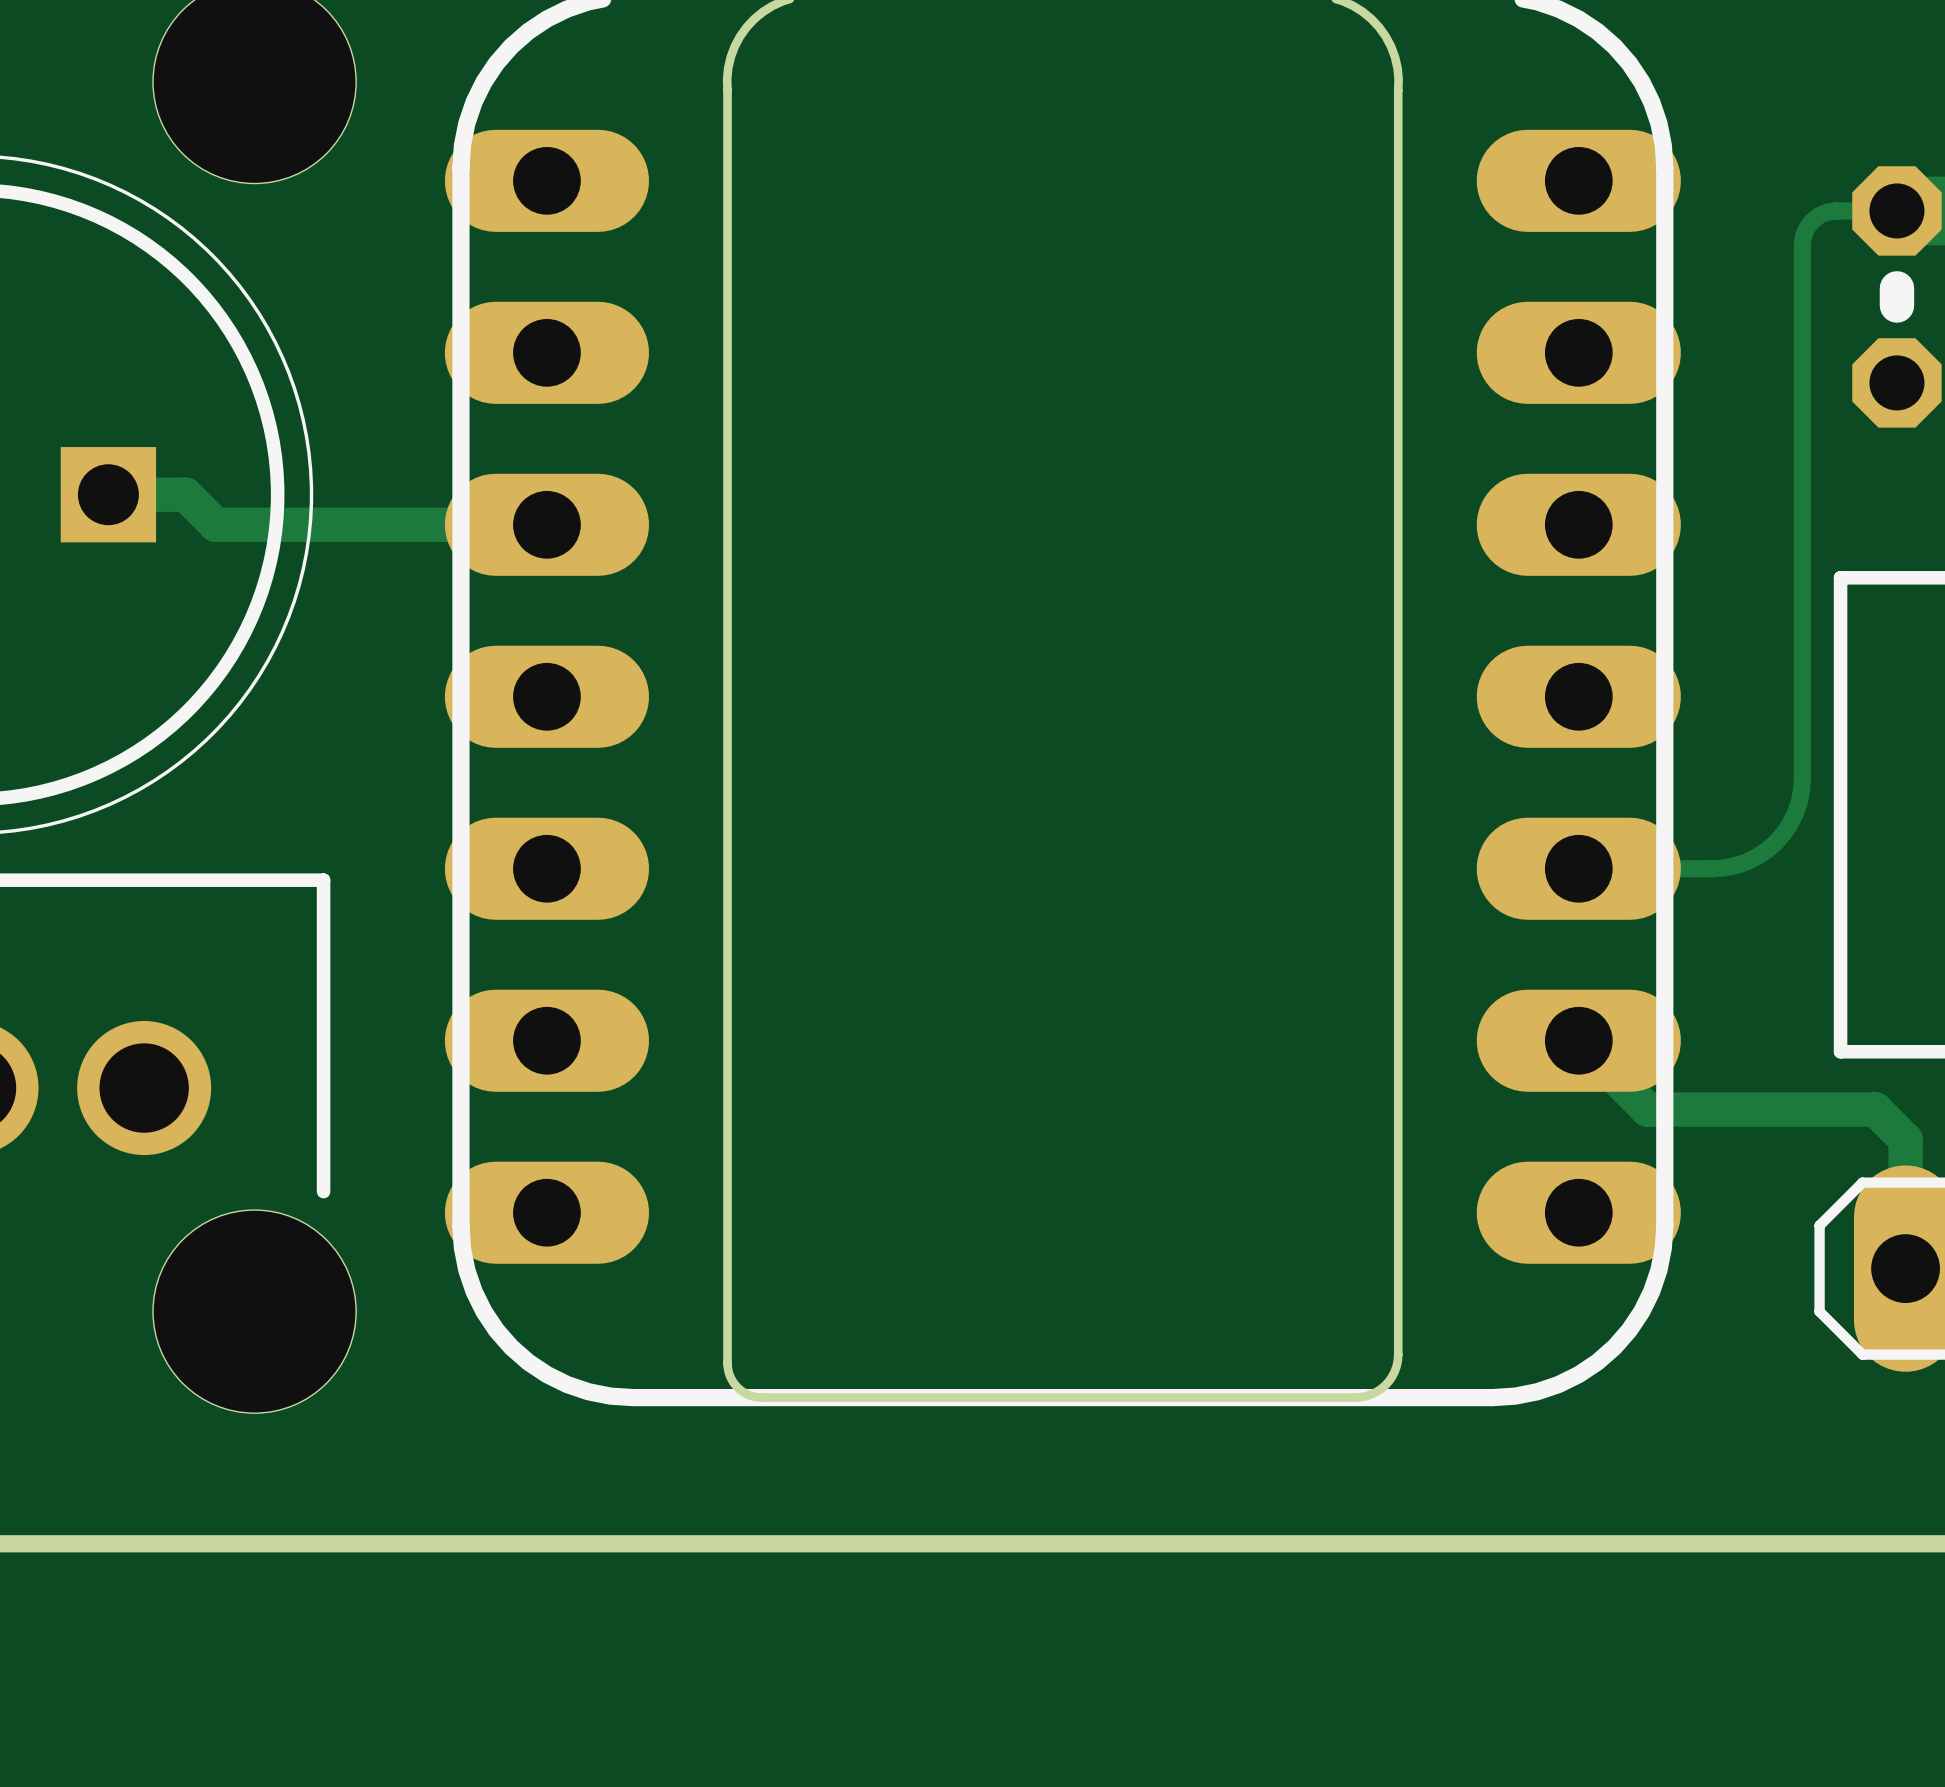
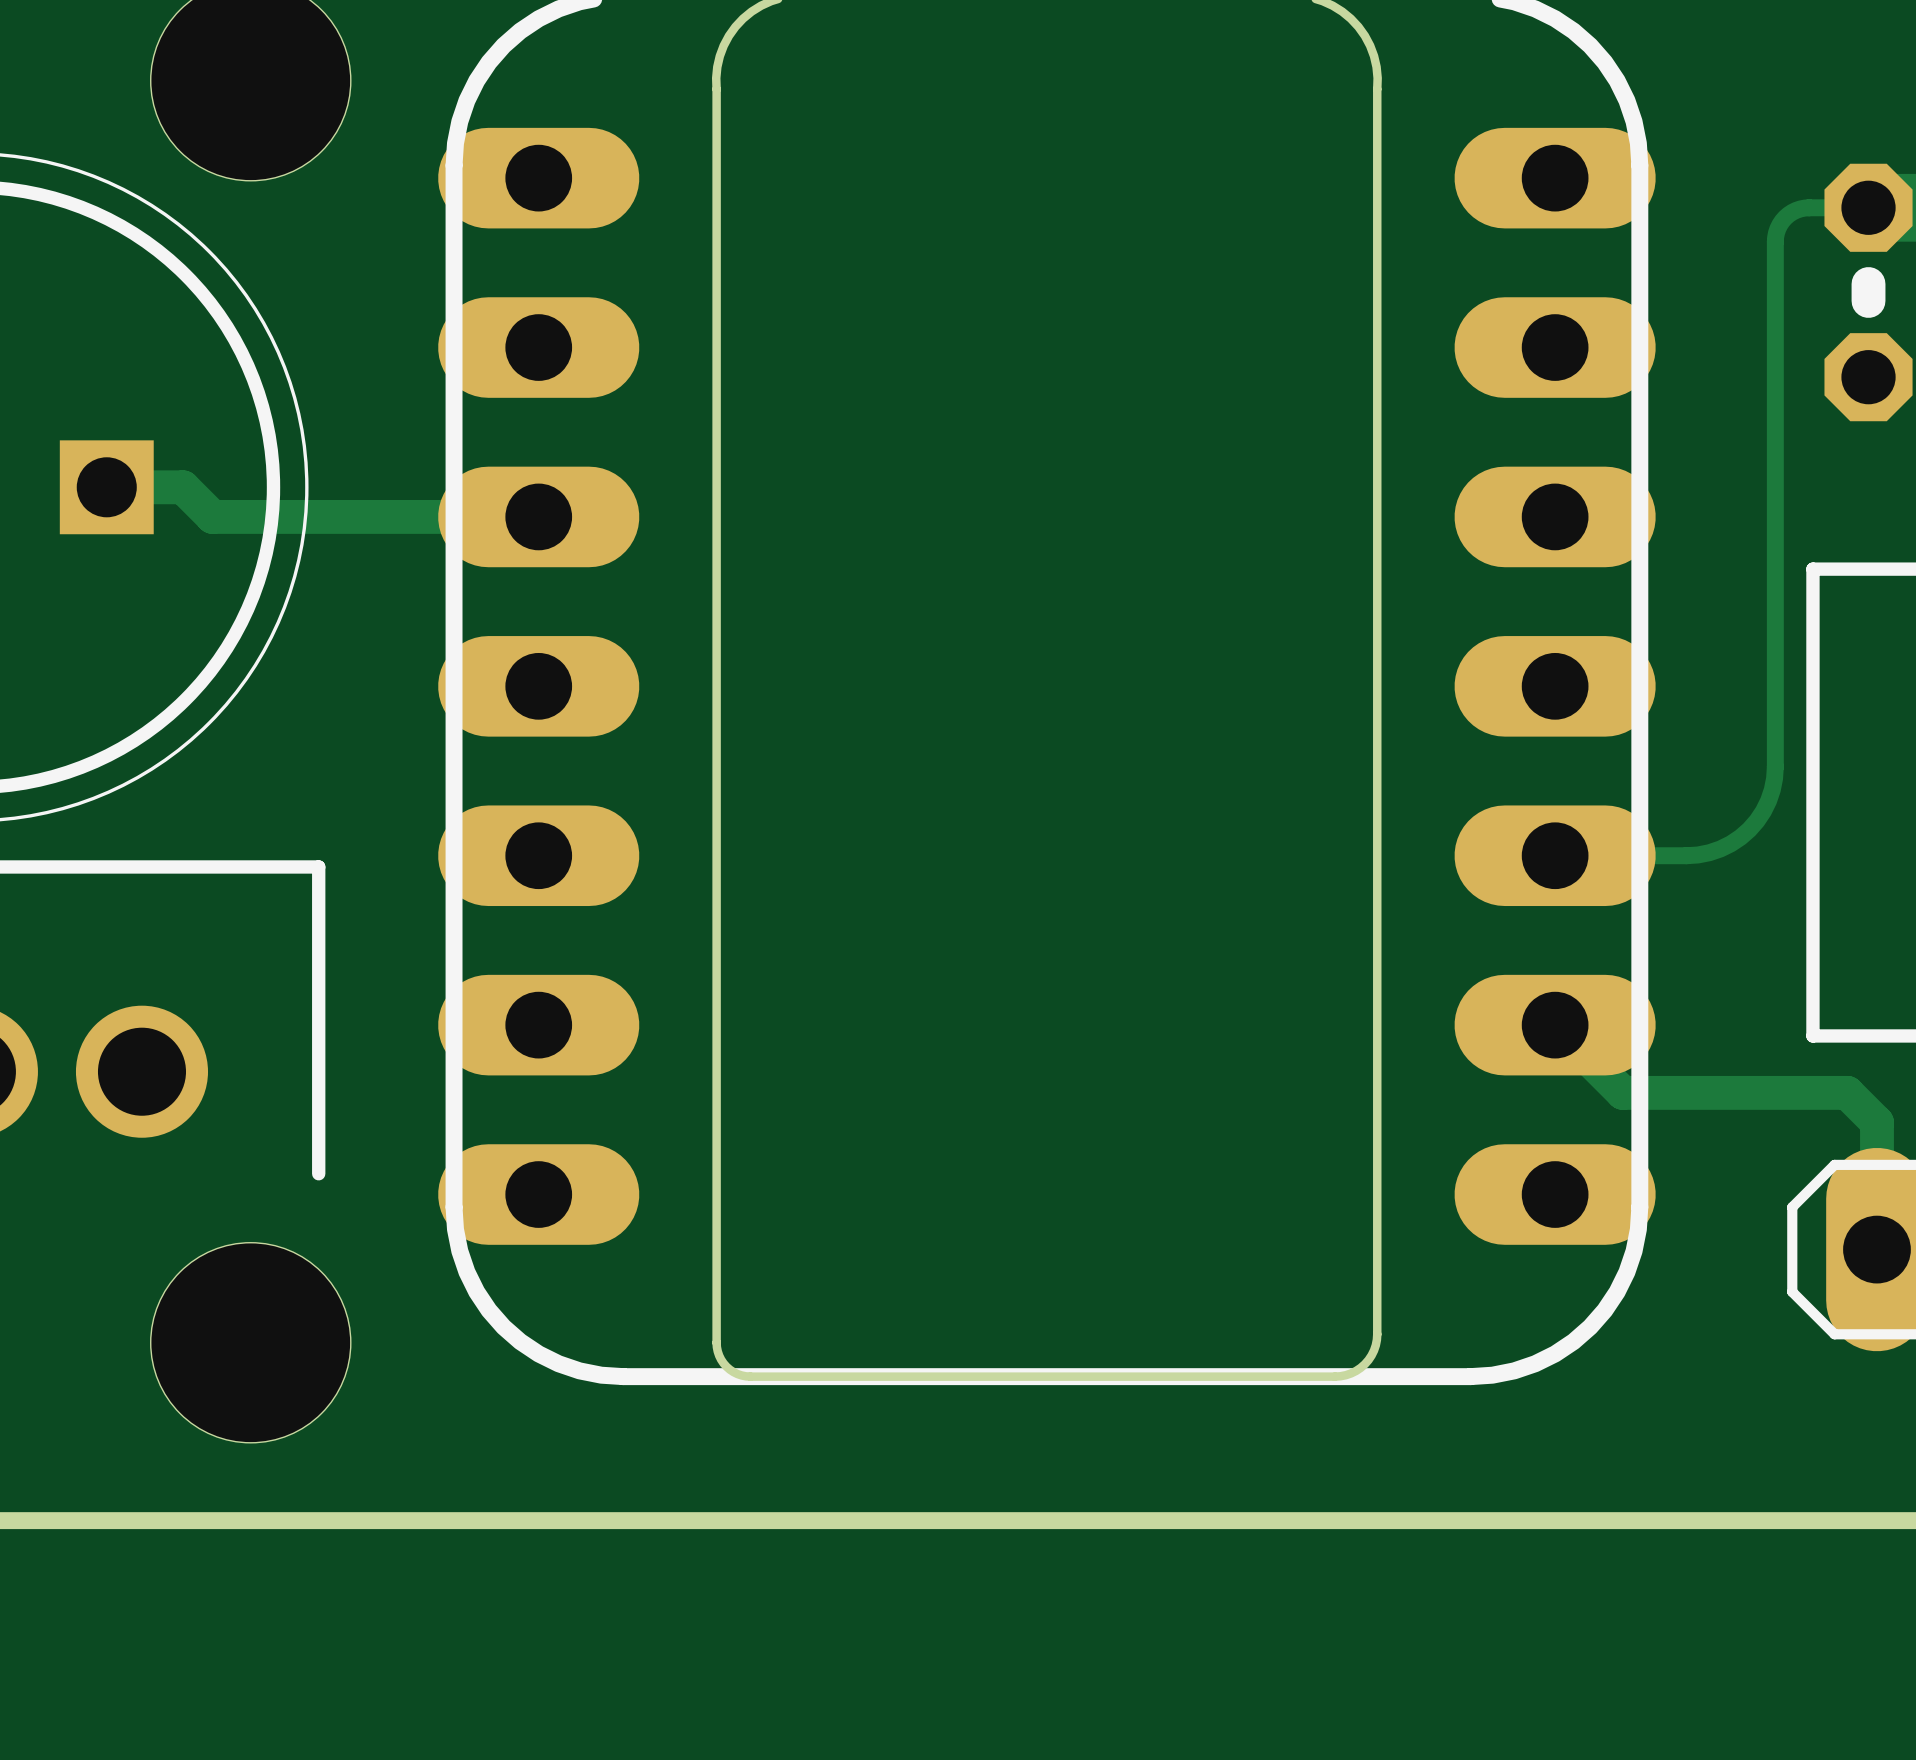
hole position: (254, 1311) -> (250, 1342)

